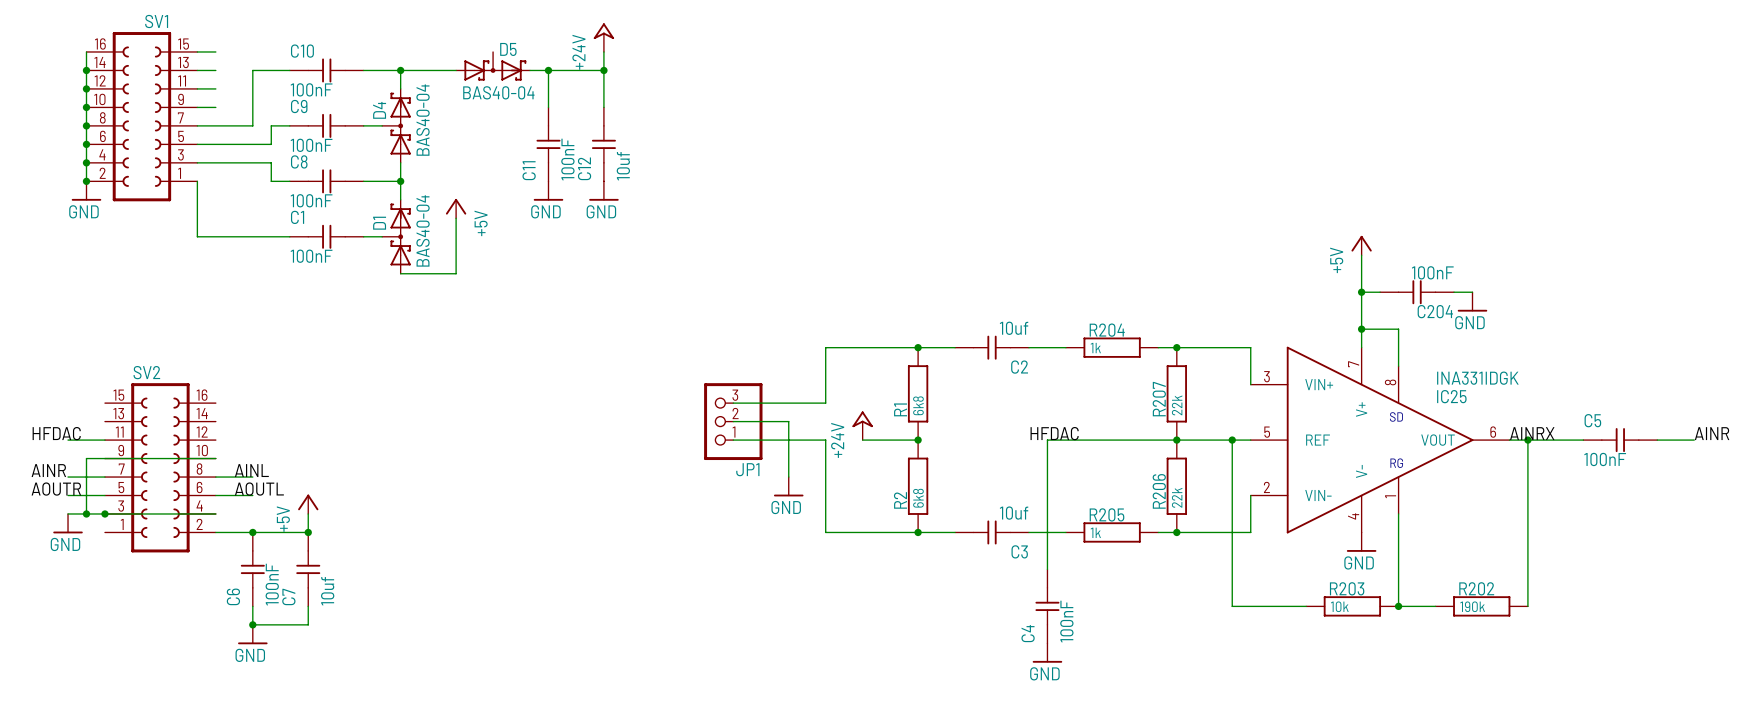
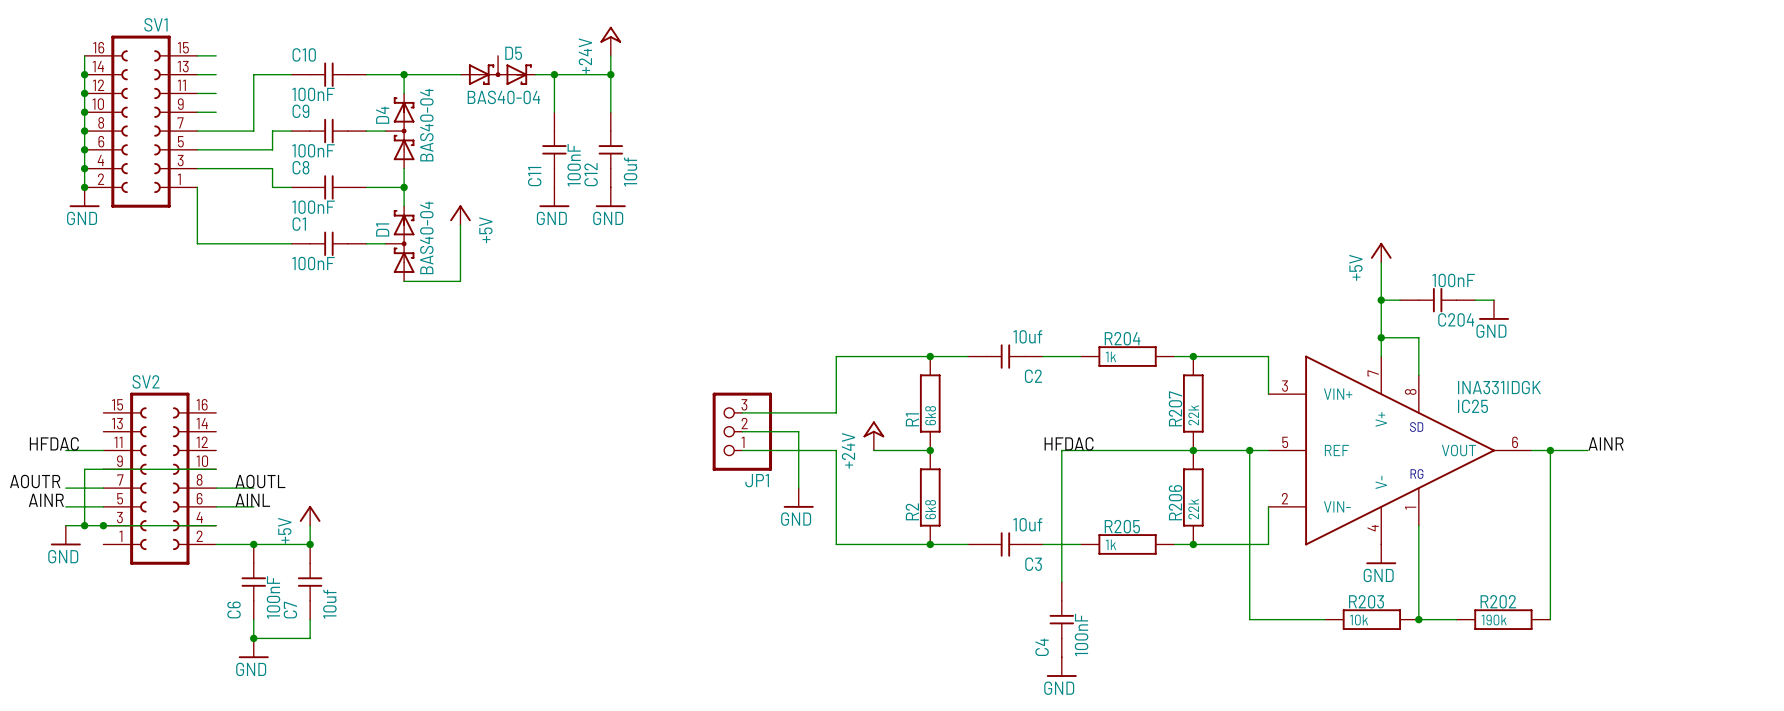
label: AINRX (1532, 433) -> none
label position: AINR (1712, 433) -> AINR (1606, 443)
wire: (1564, 440) (1583, 440) -> none
C5: 100nF (1620, 440) -> none
wire: (1657, 440) (1694, 440) -> none
label: none -> AOUTR (35, 481)
label: AINR (48, 470) -> none
label: AINL (251, 470) -> AOUTL (260, 481)
label: AOUTR (56, 489) -> AINR (46, 500)
label: AOUTL (259, 489) -> AINL (252, 500)

